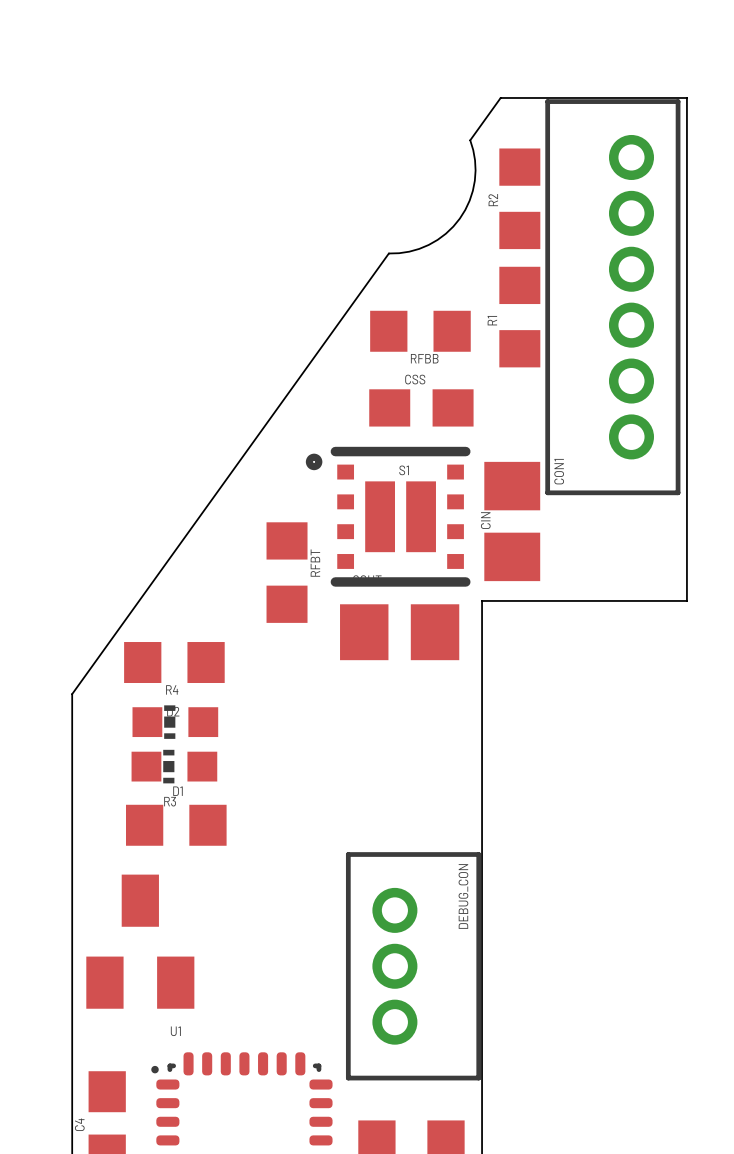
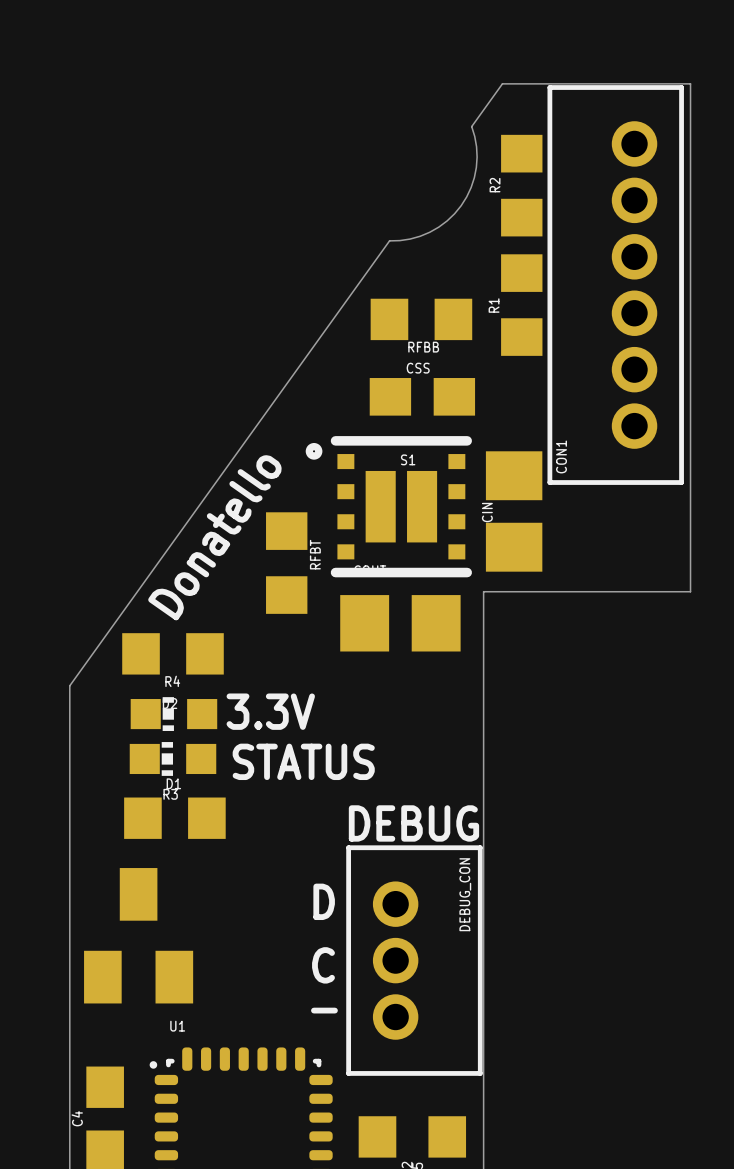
text: none -> Donatello (214, 537)
text: none -> 3.3V (270, 711)
text: none -> STATUS (303, 761)
text: none -> DEBUG (413, 823)
text: none -> D (324, 901)
text: none -> C (323, 965)
text: none -> - (324, 1010)

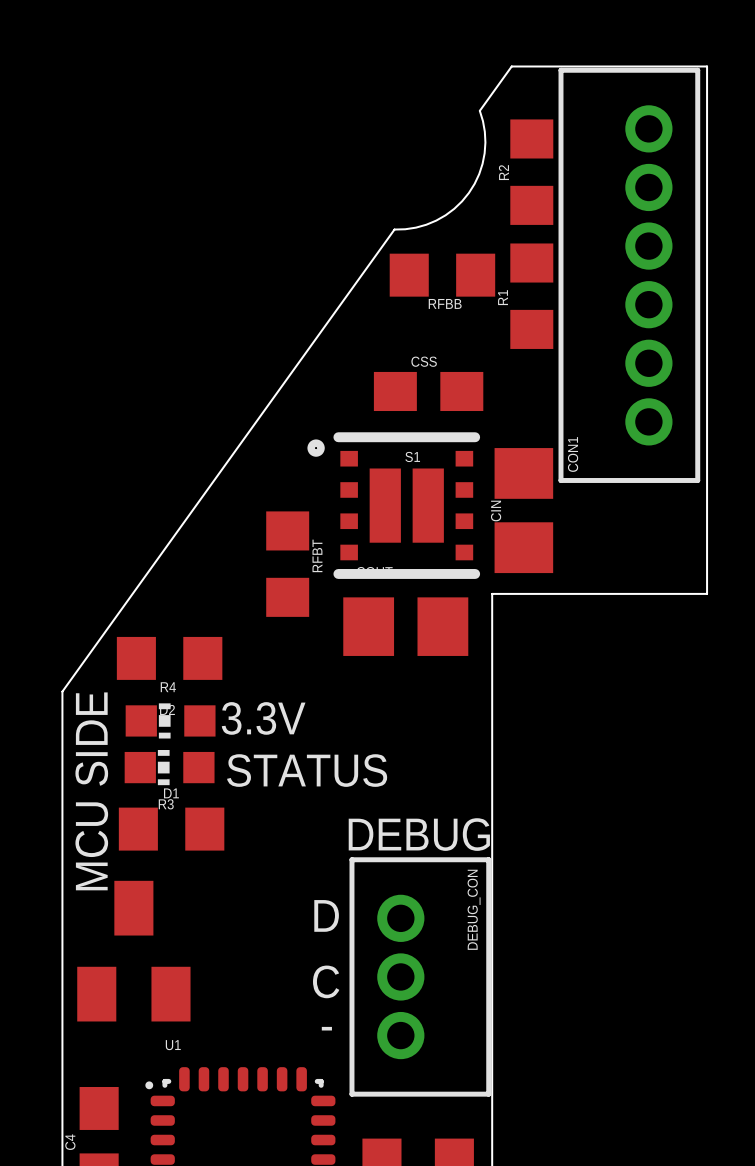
RFBB position: (421, 319) -> (442, 275)
text: Donatello (214, 537) -> none
text: none -> MCU SIDE (91, 791)

